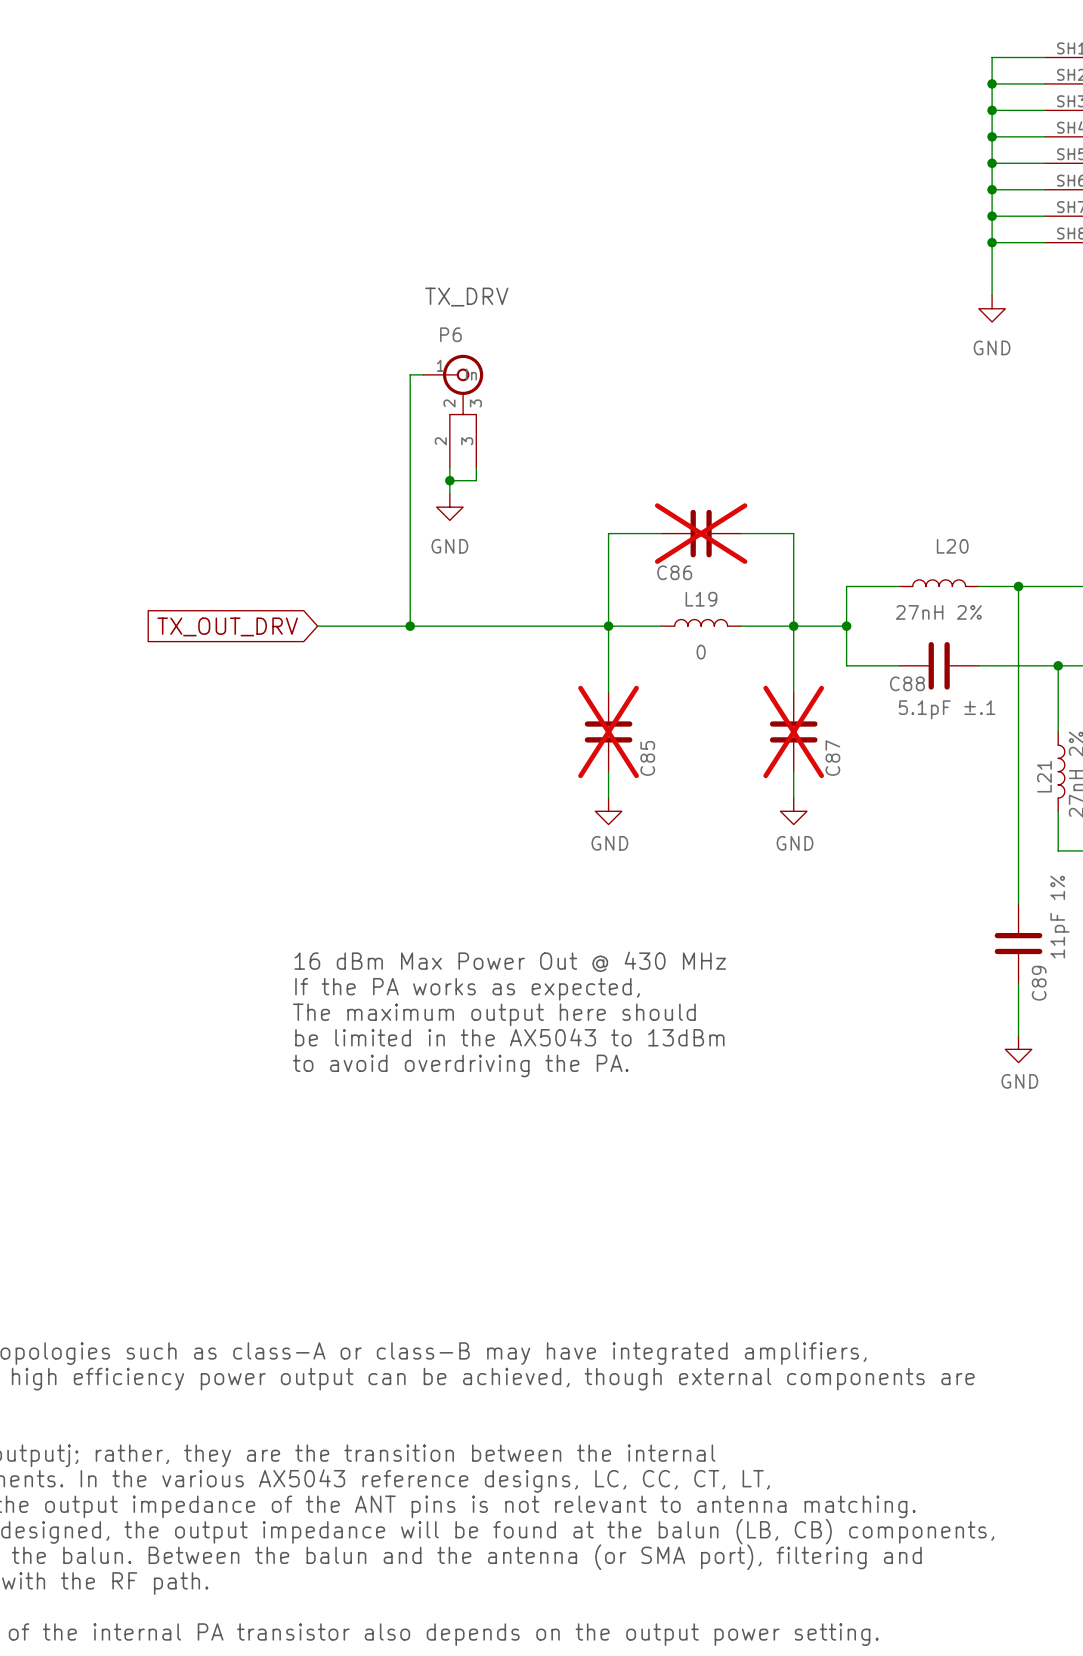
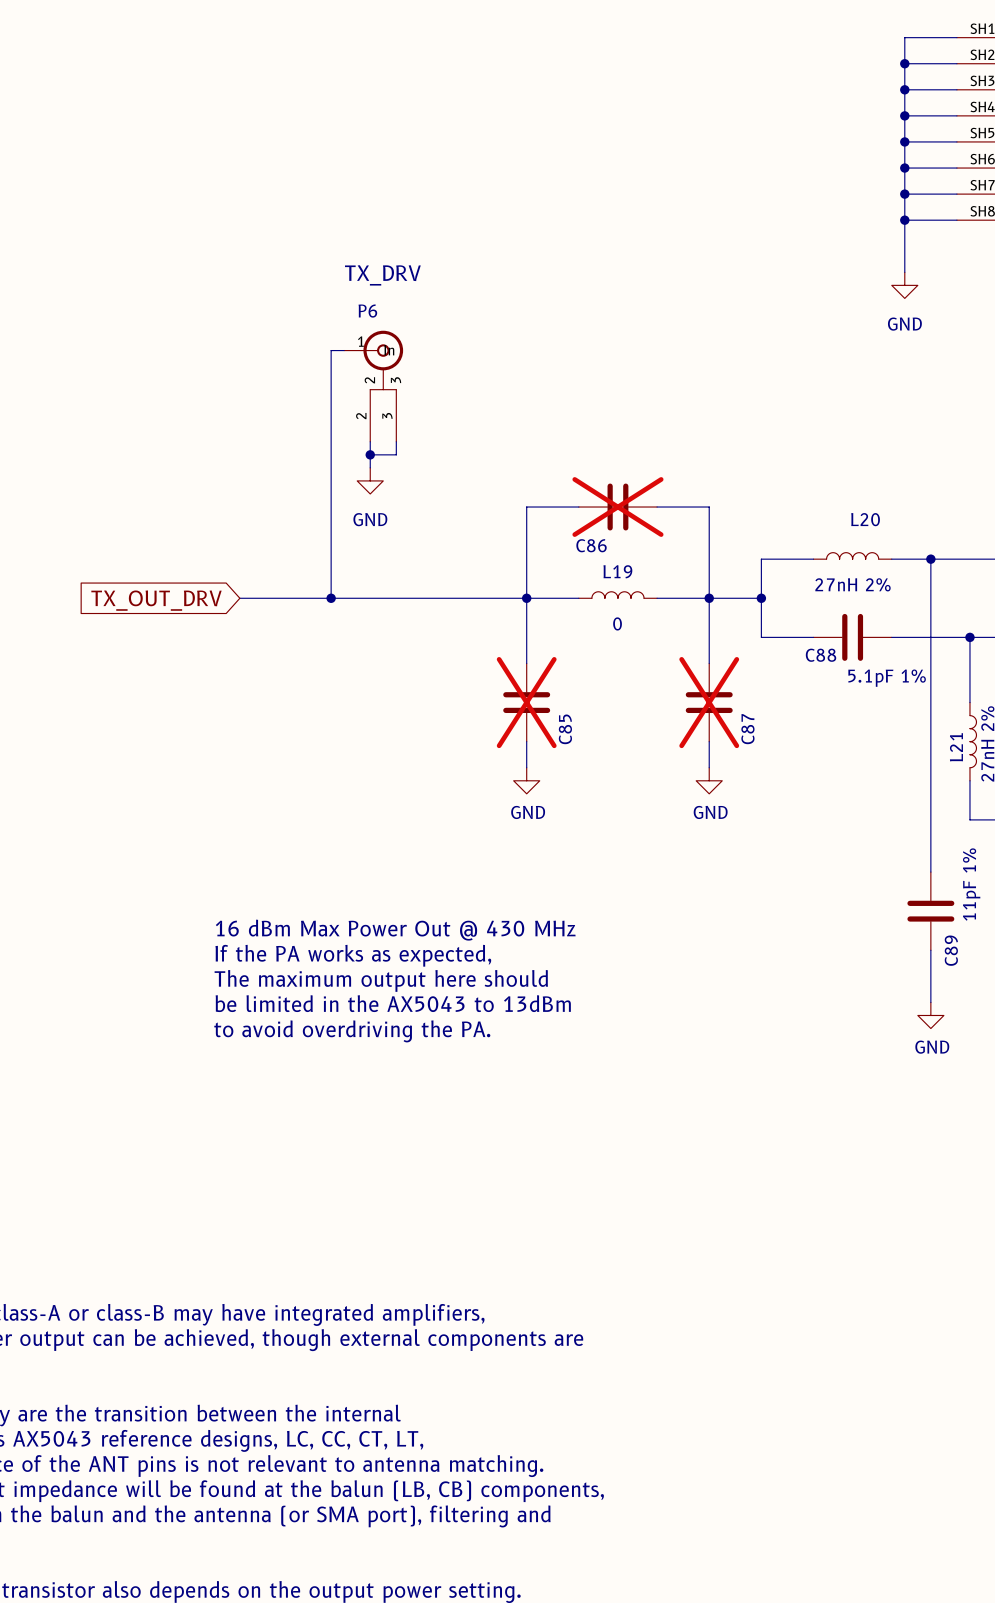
C88 value: 5.1pF ±.1 (947, 709) -> 5.1pF 1% (887, 678)

